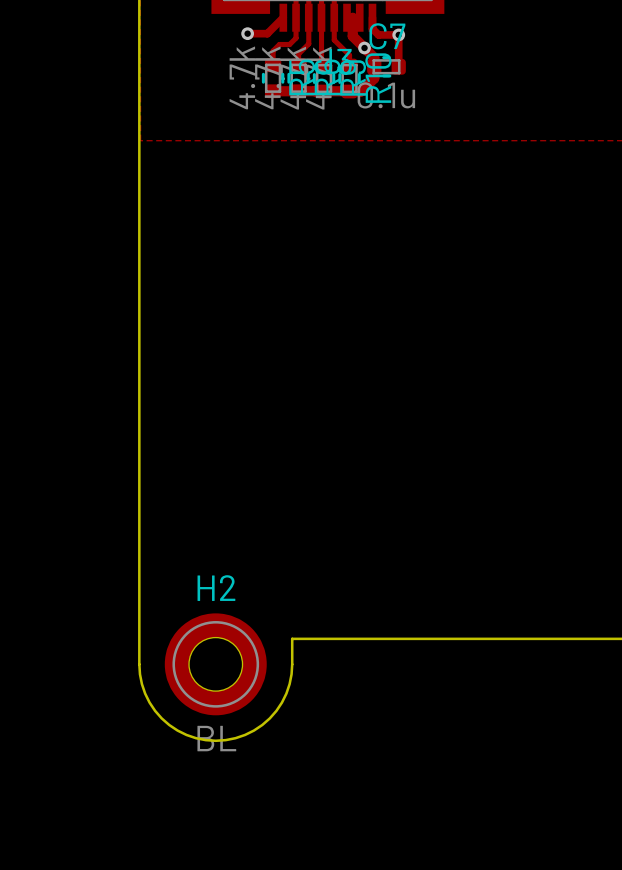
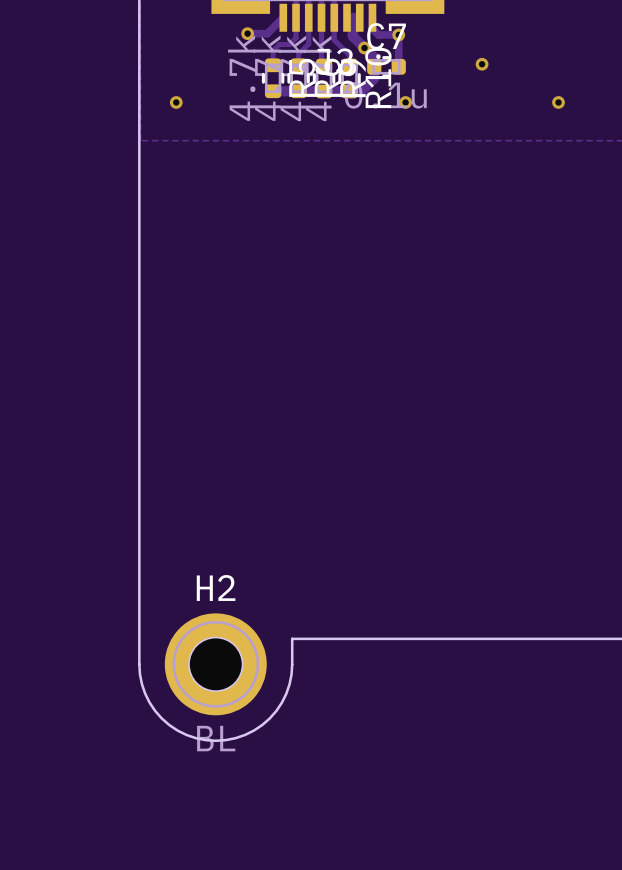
via: none -> (482, 64)
via: none -> (176, 102)
via: none -> (405, 102)
via: none -> (558, 102)

